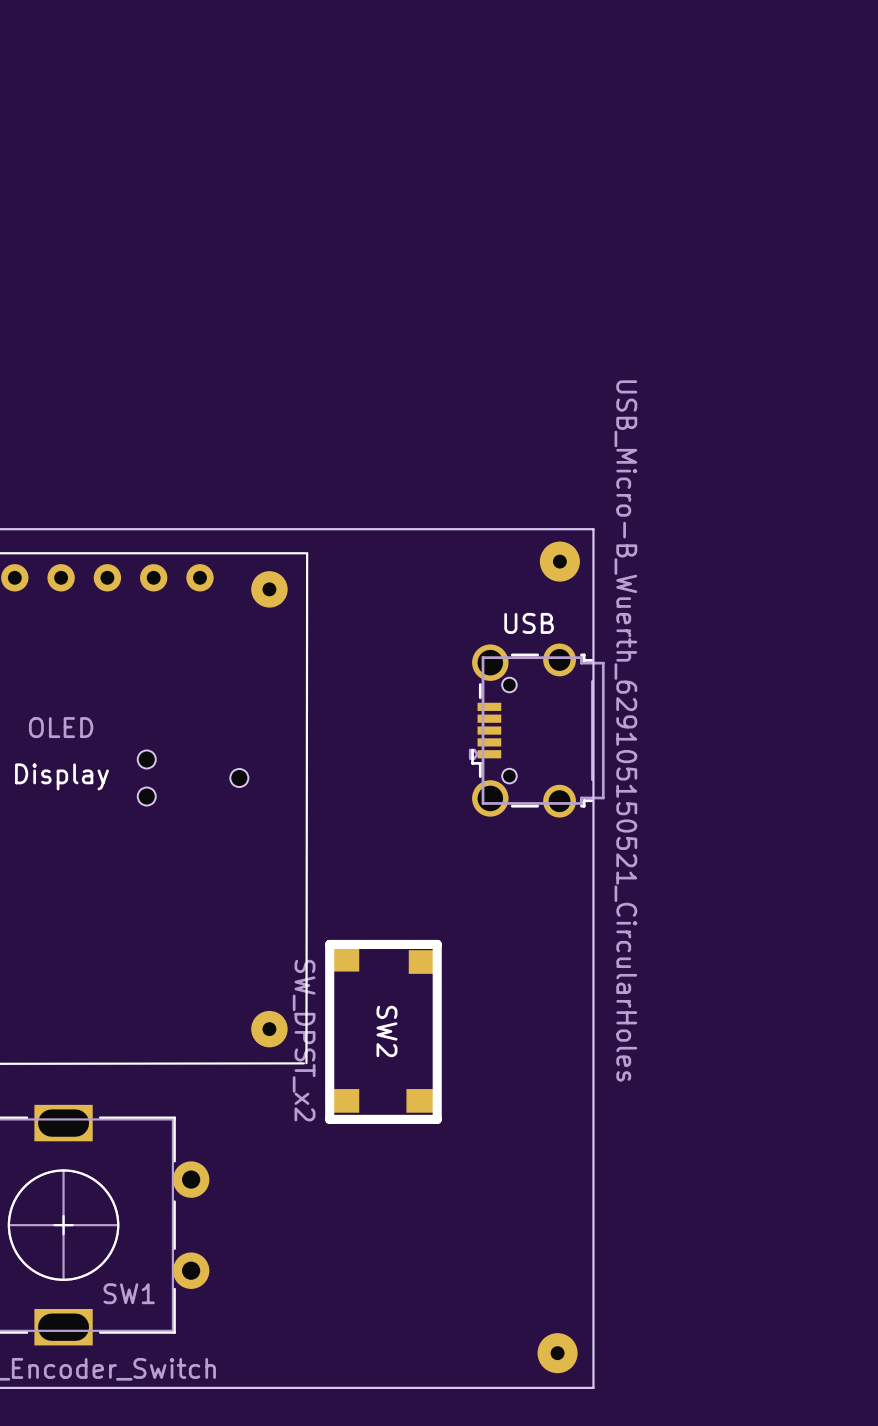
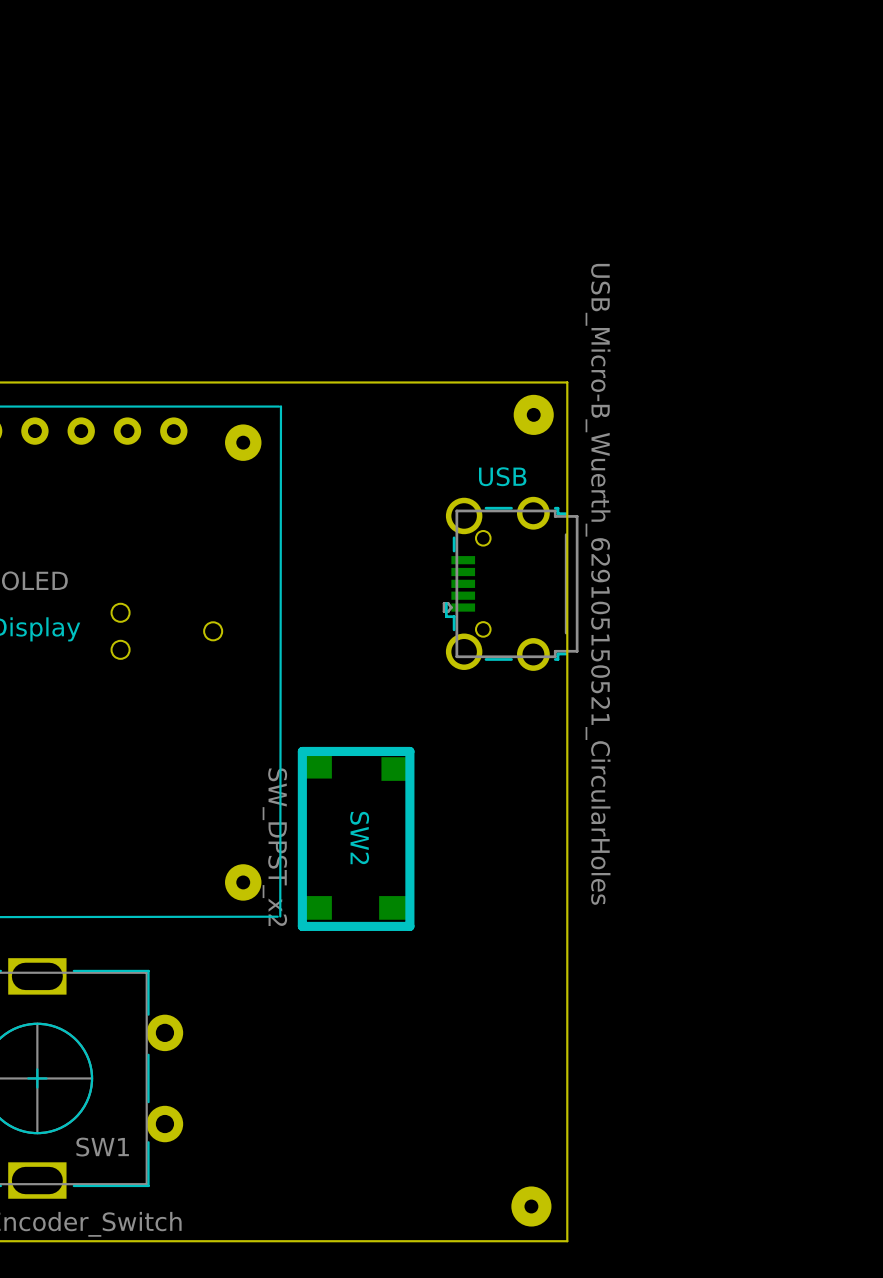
SW2 position: (383, 1031) -> (356, 838)

